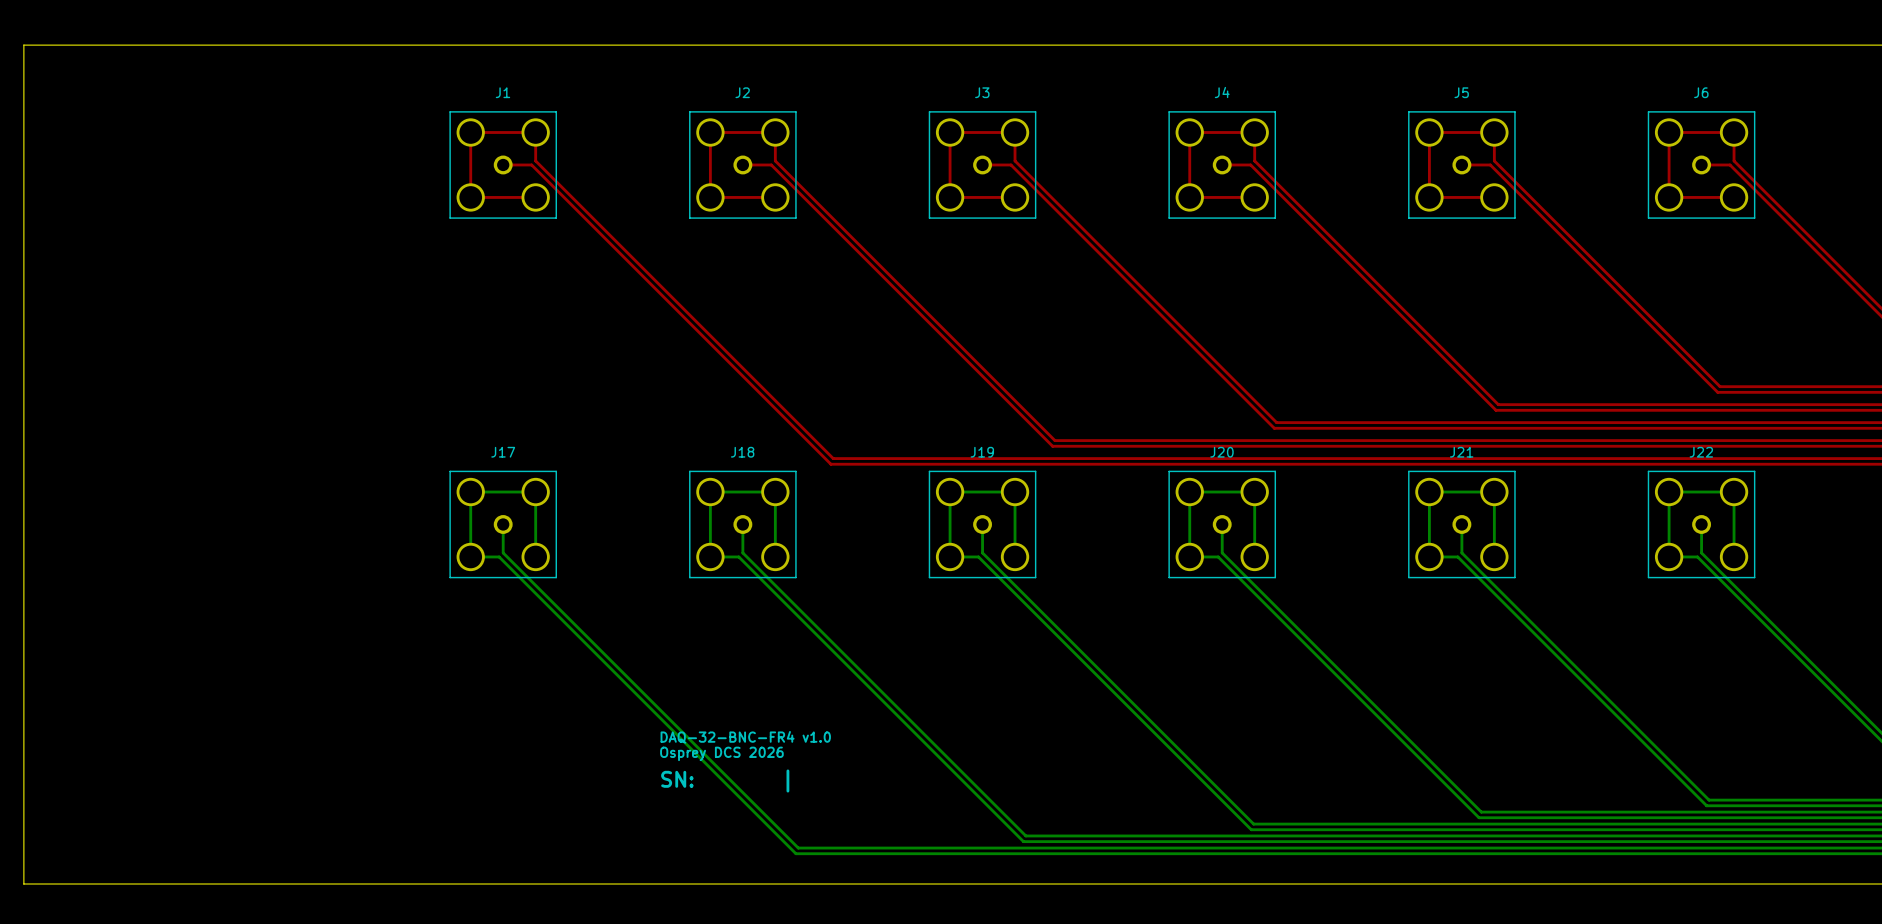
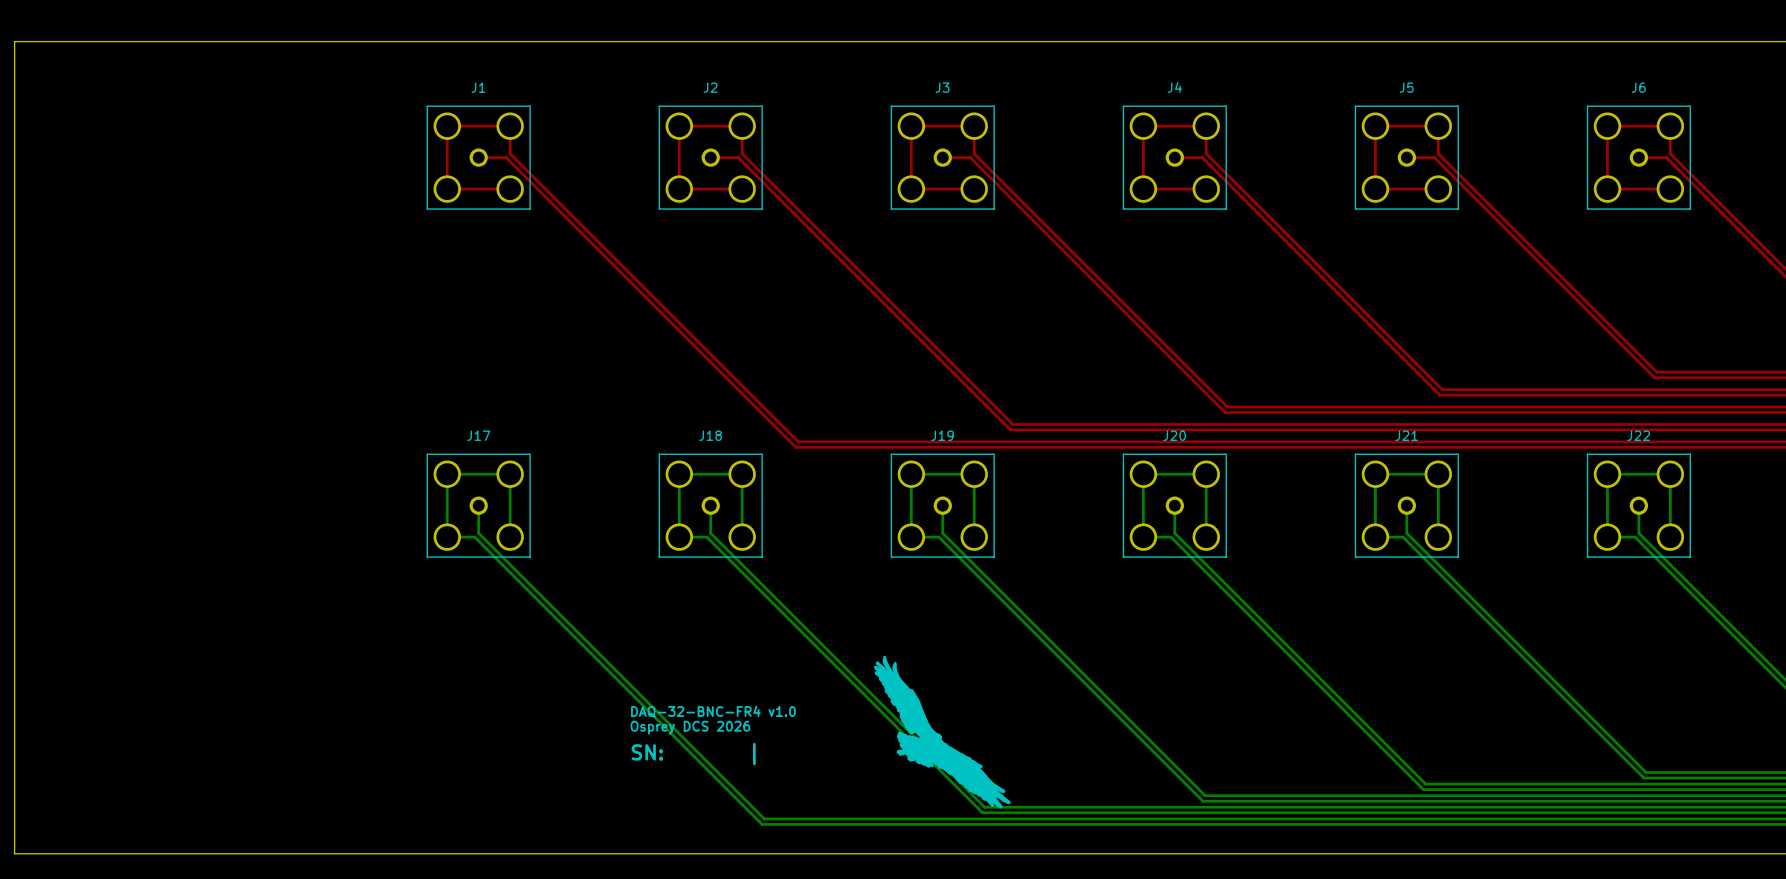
drawing: none -> [874, 655, 1011, 809]

